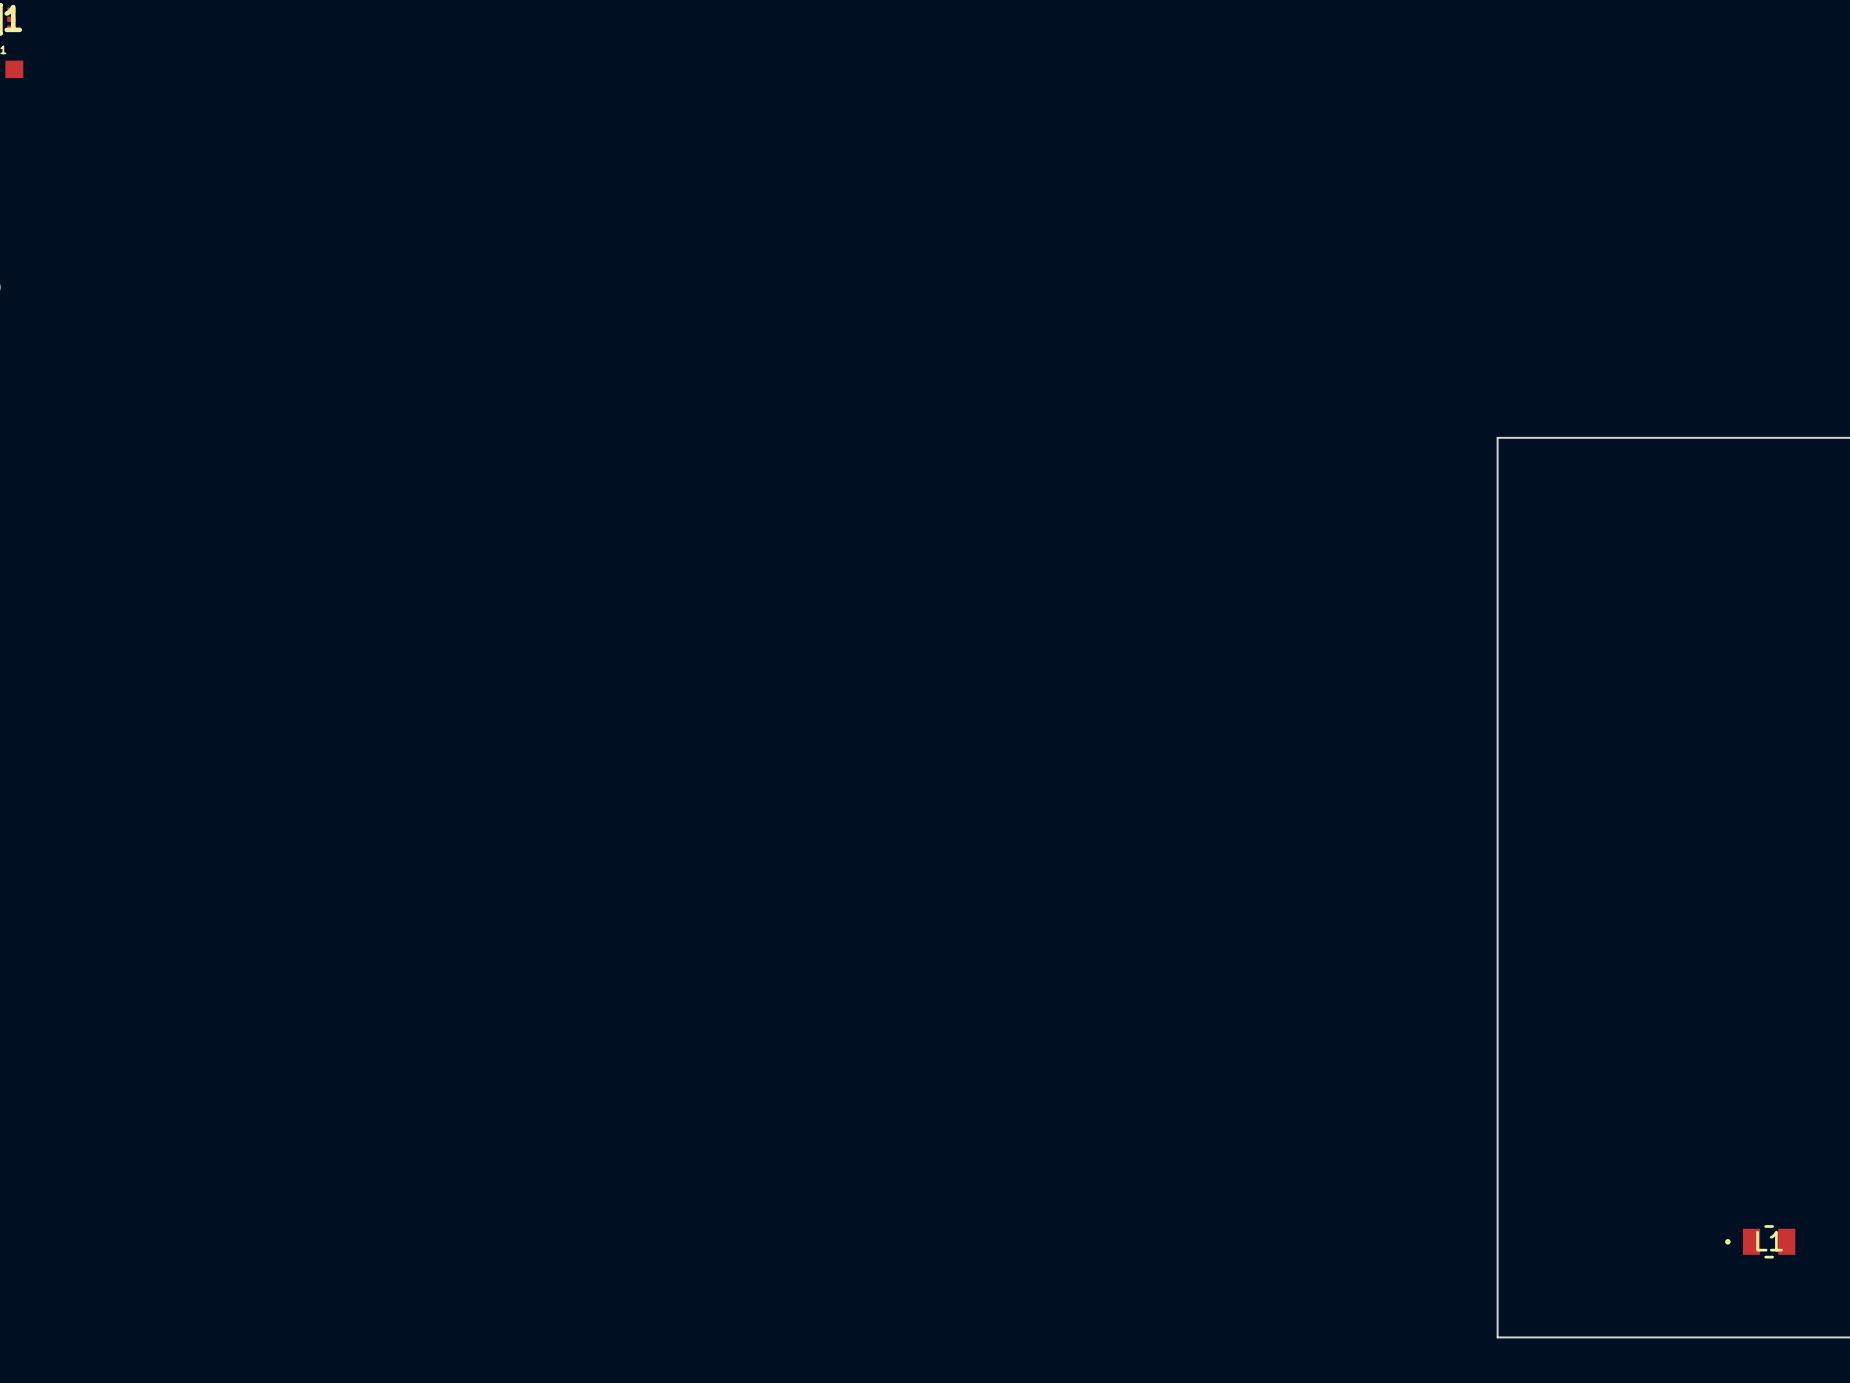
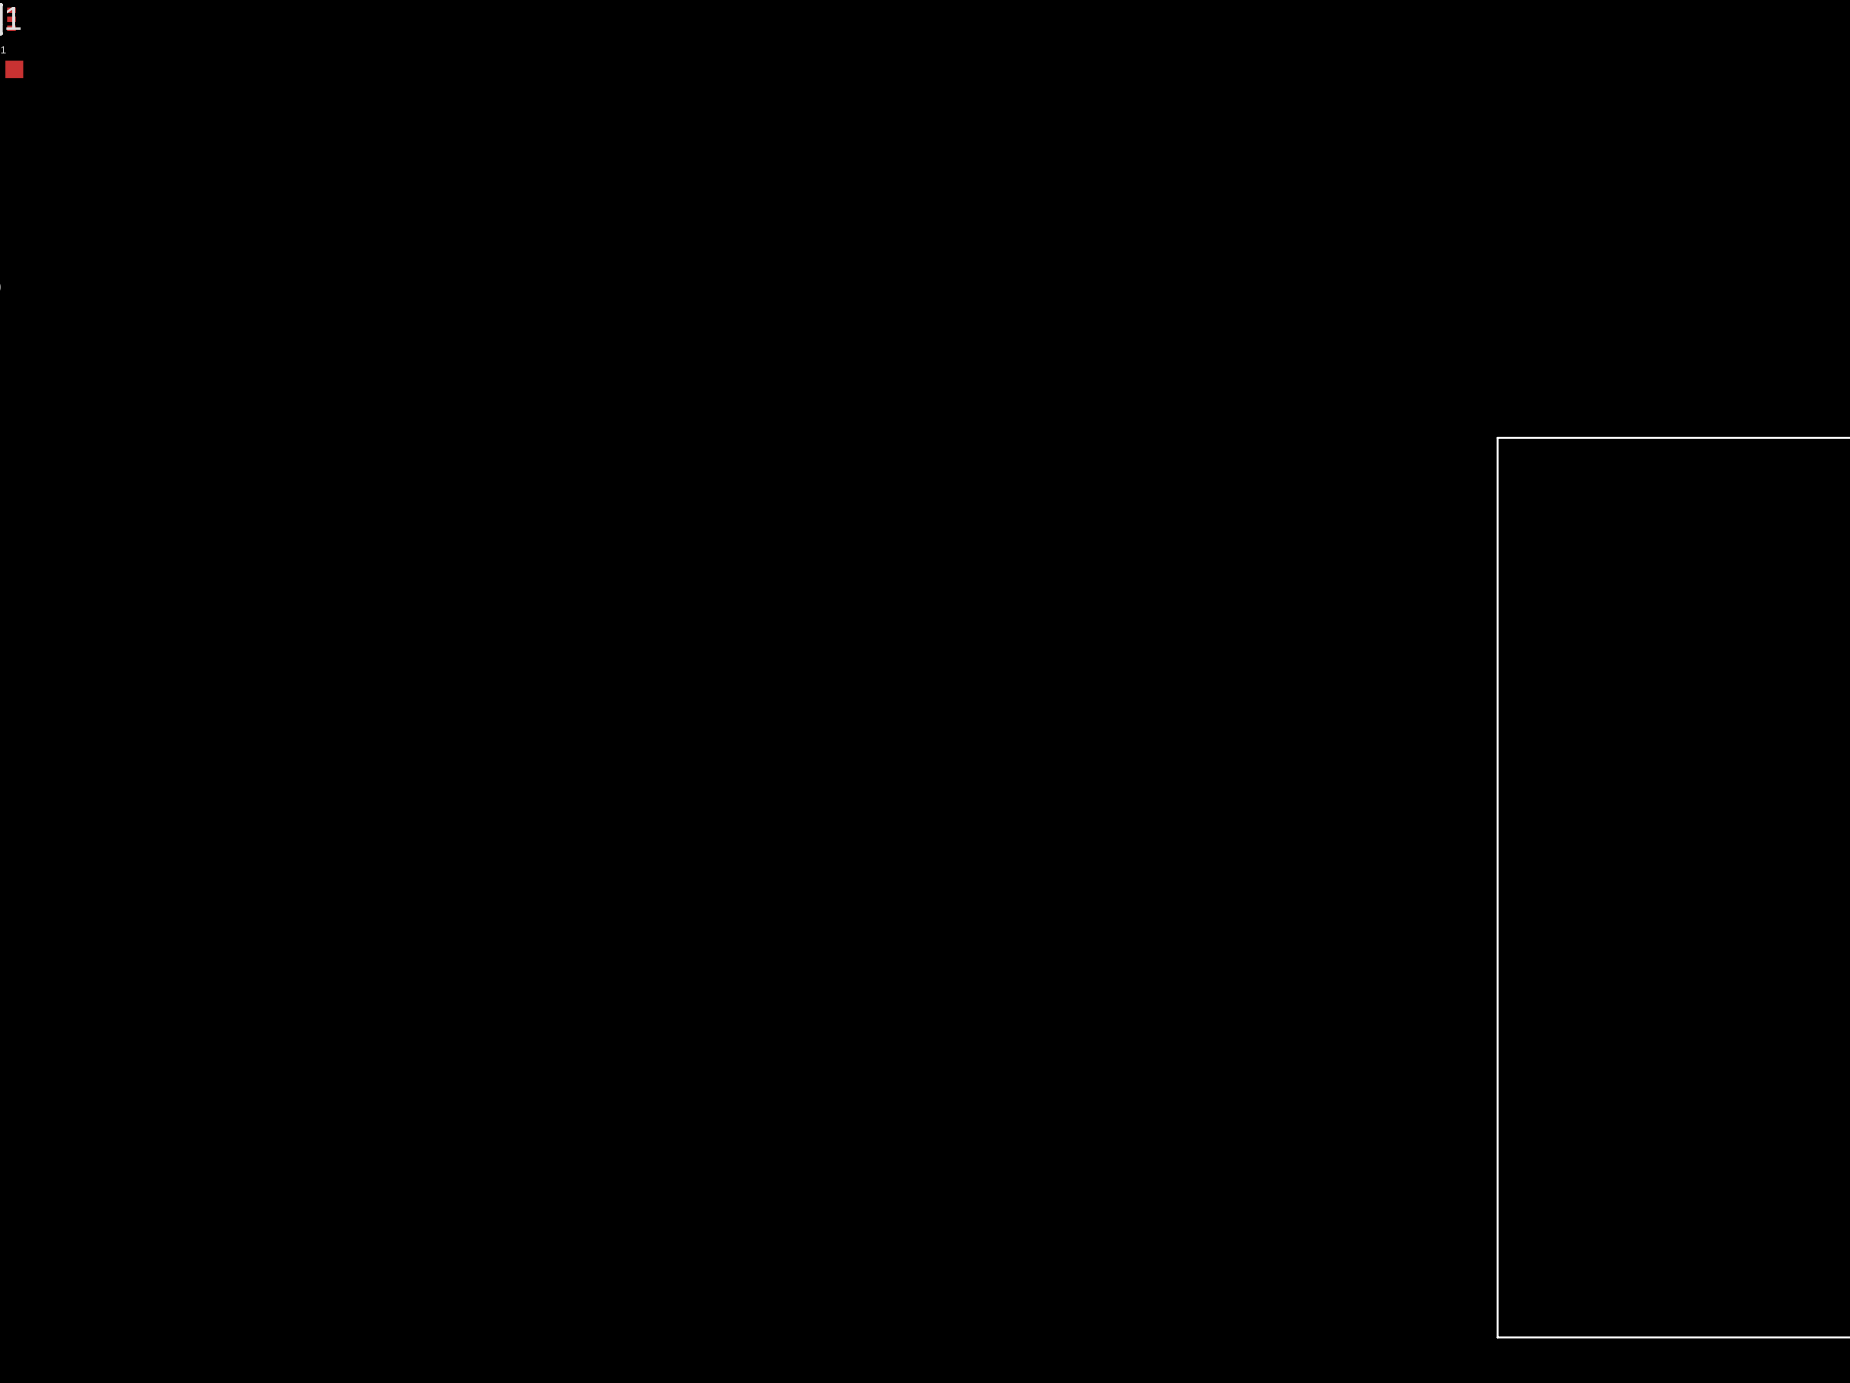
L1: (1760, 1241) -> none

